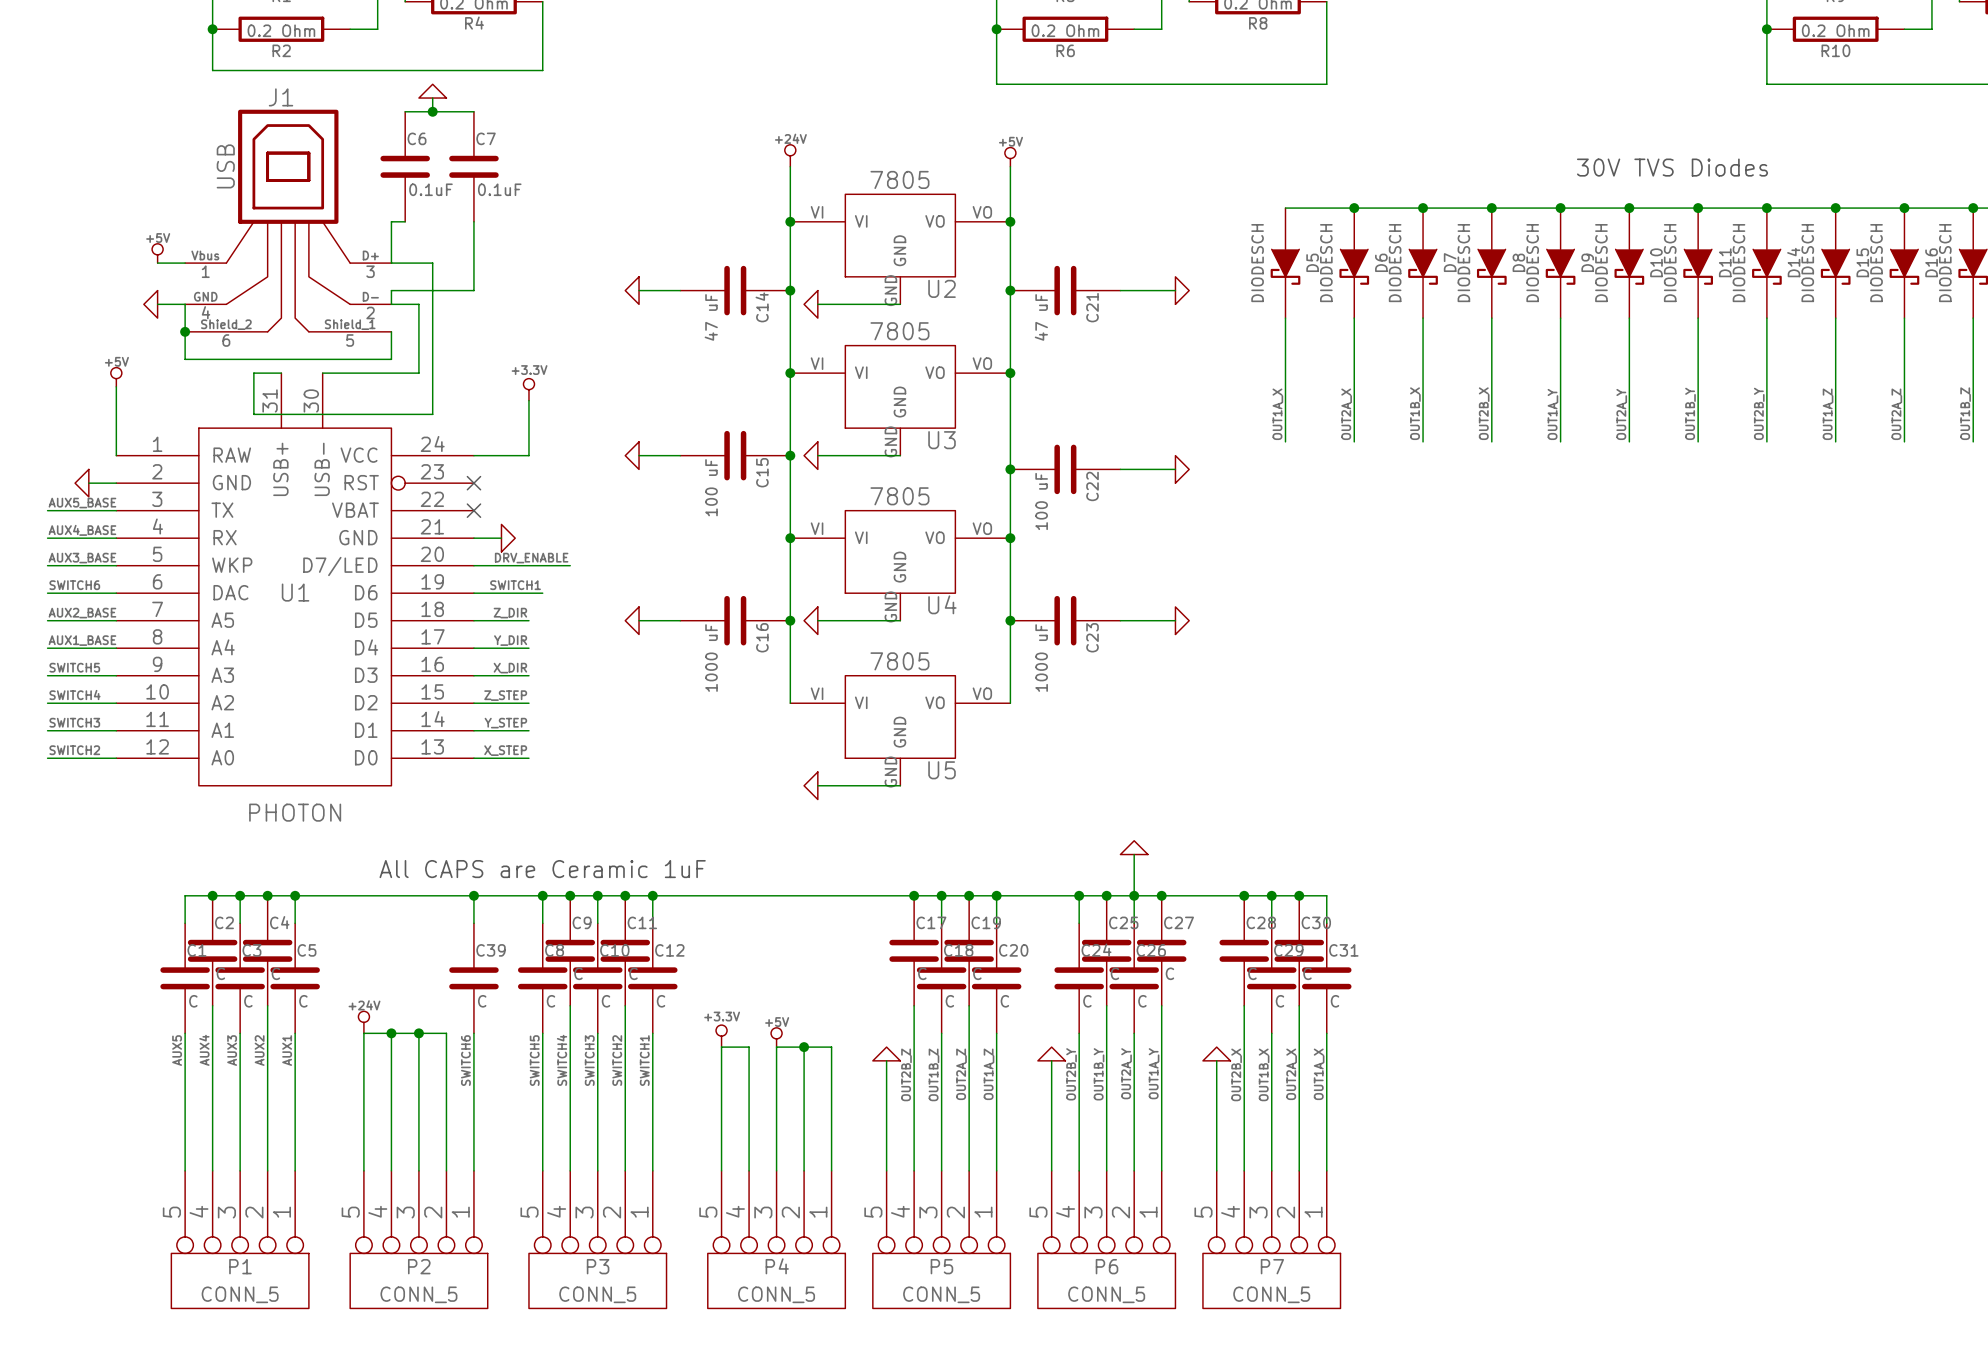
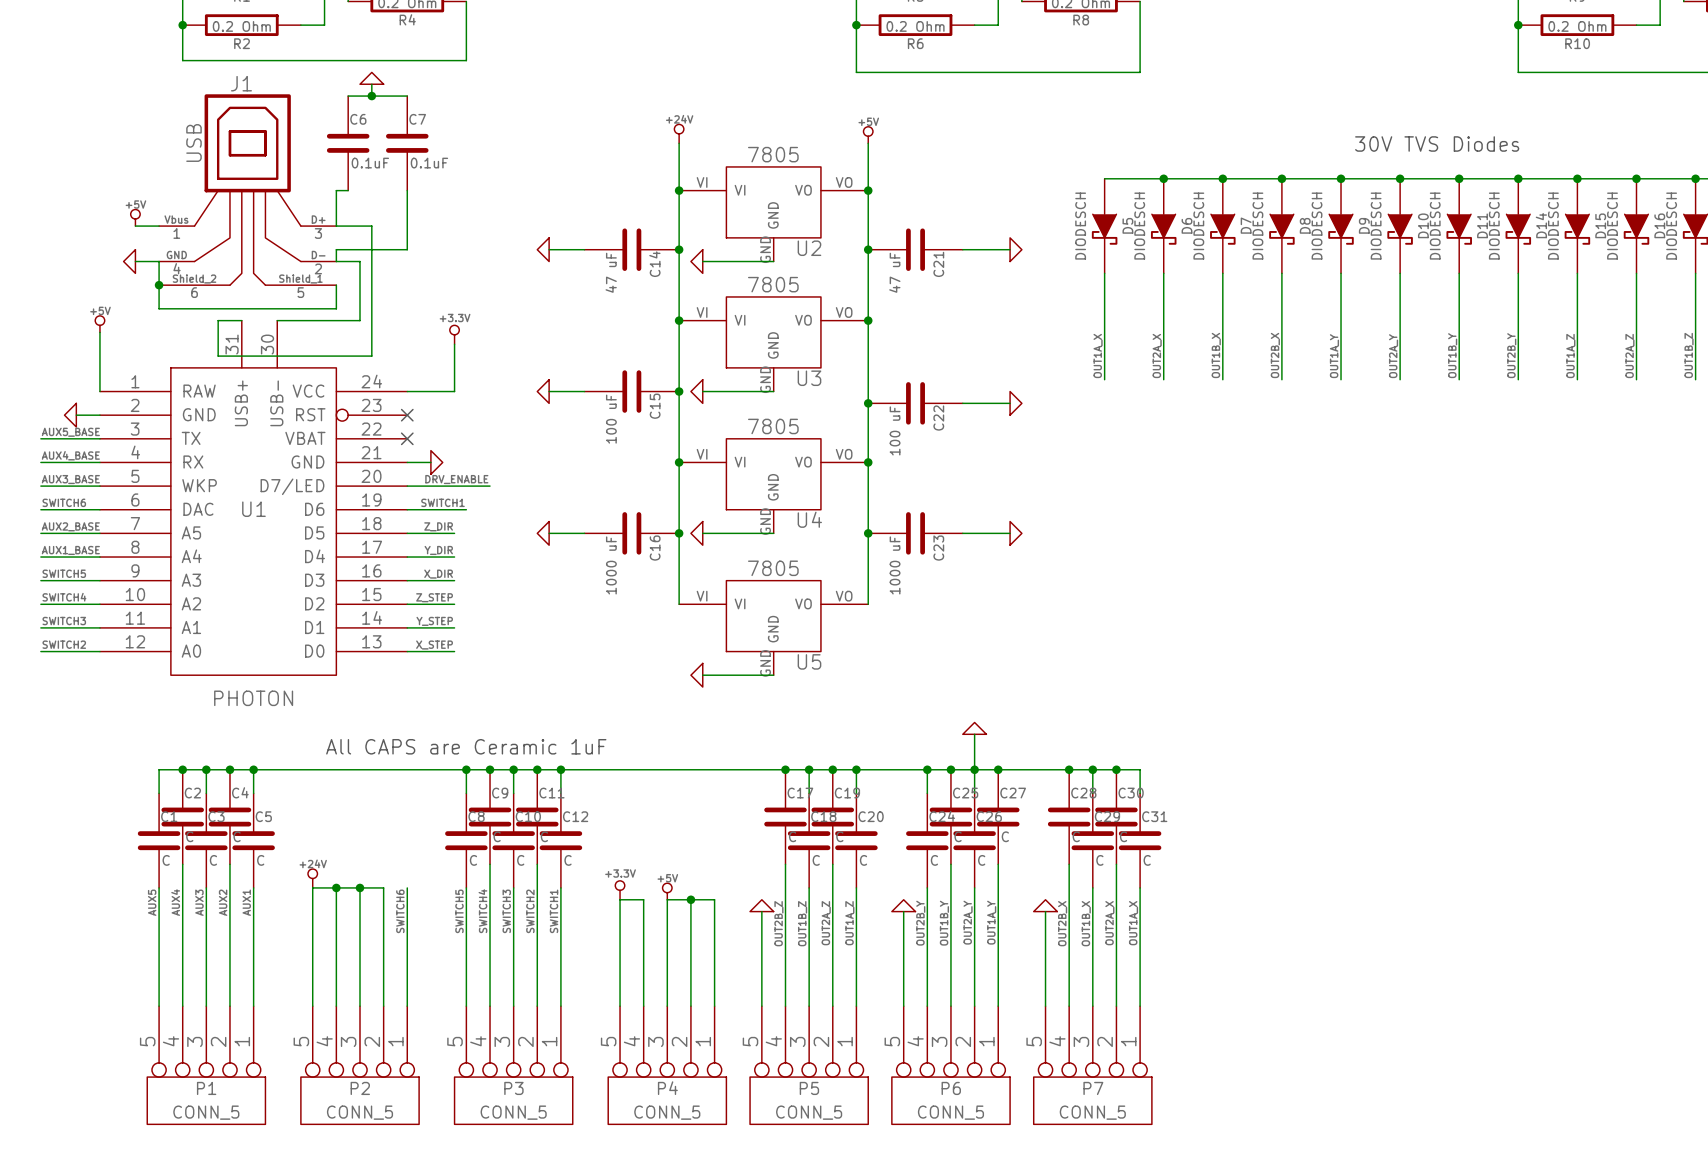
wire: (473, 895) (473, 923) -> none
junction: (473, 895) -> none
C39: C (473, 978) -> none

